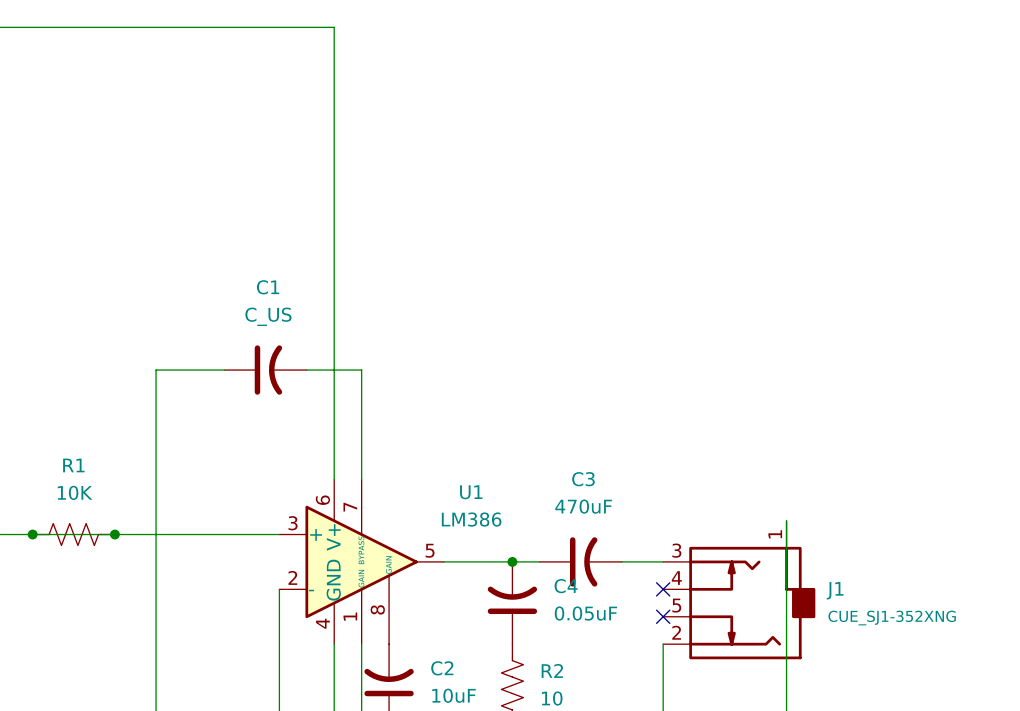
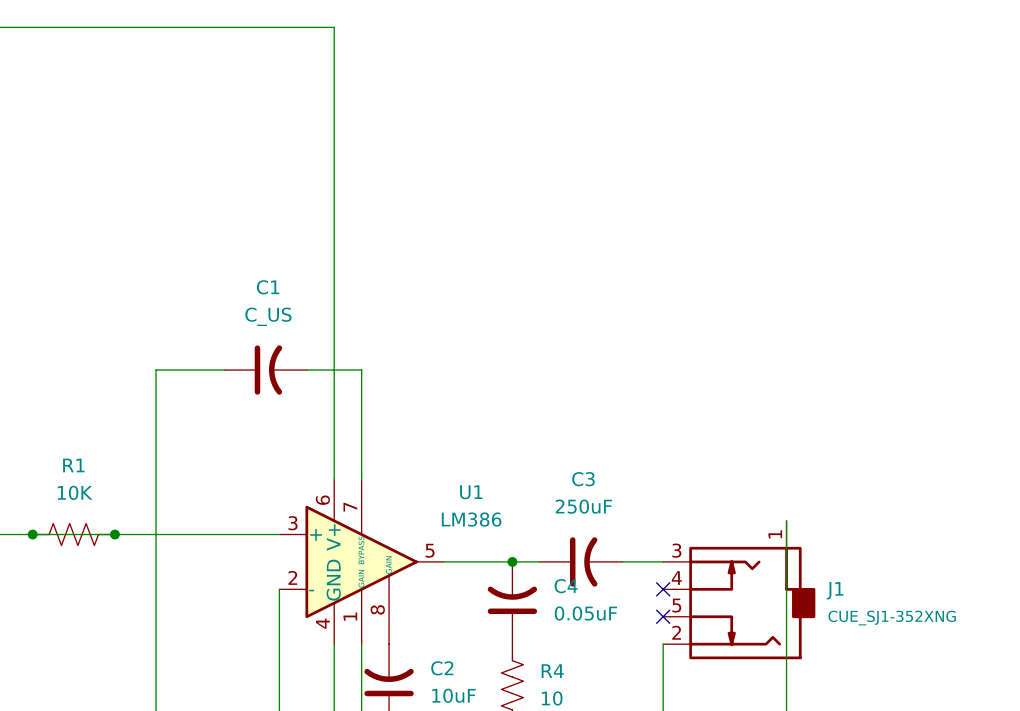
C3 value: 470uF (583, 506) -> 250uF (583, 506)
R2 name: R2 (552, 670) -> R4 (552, 671)

